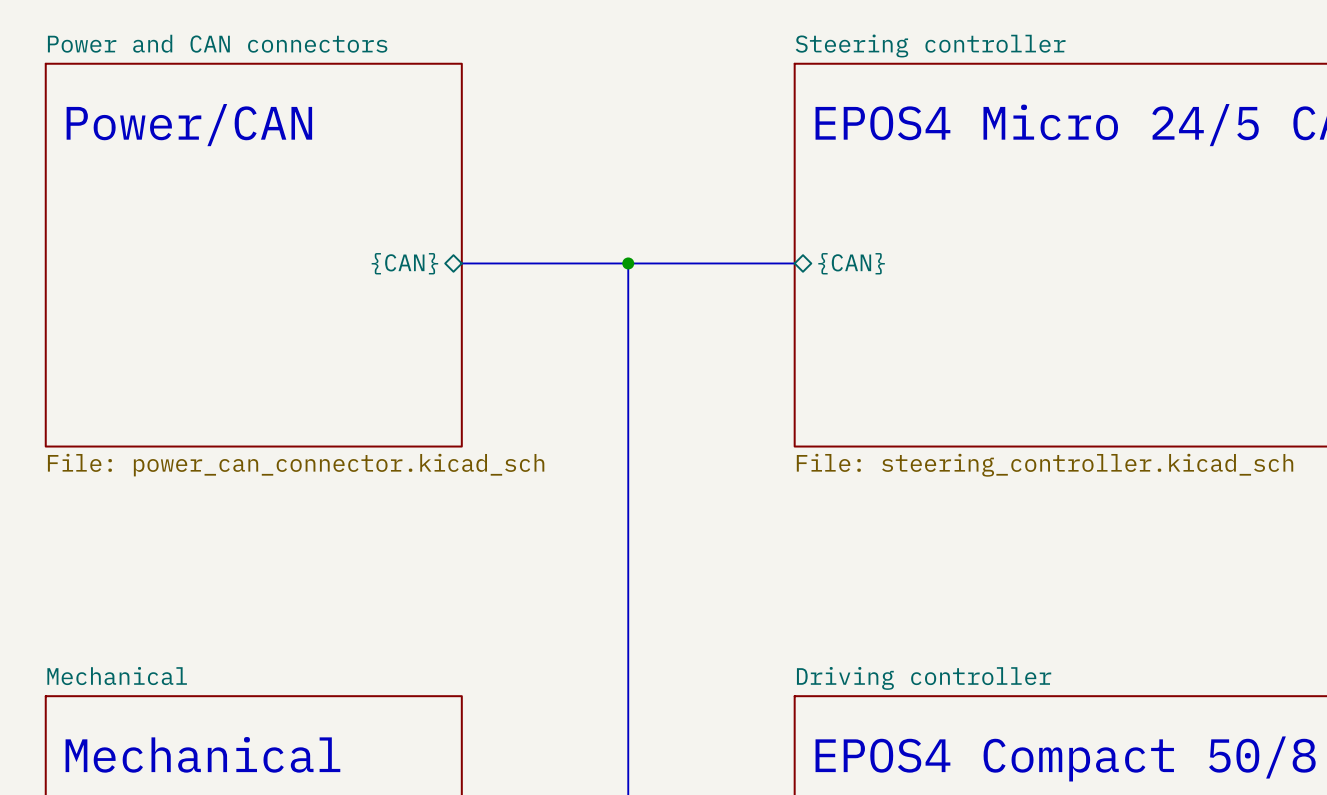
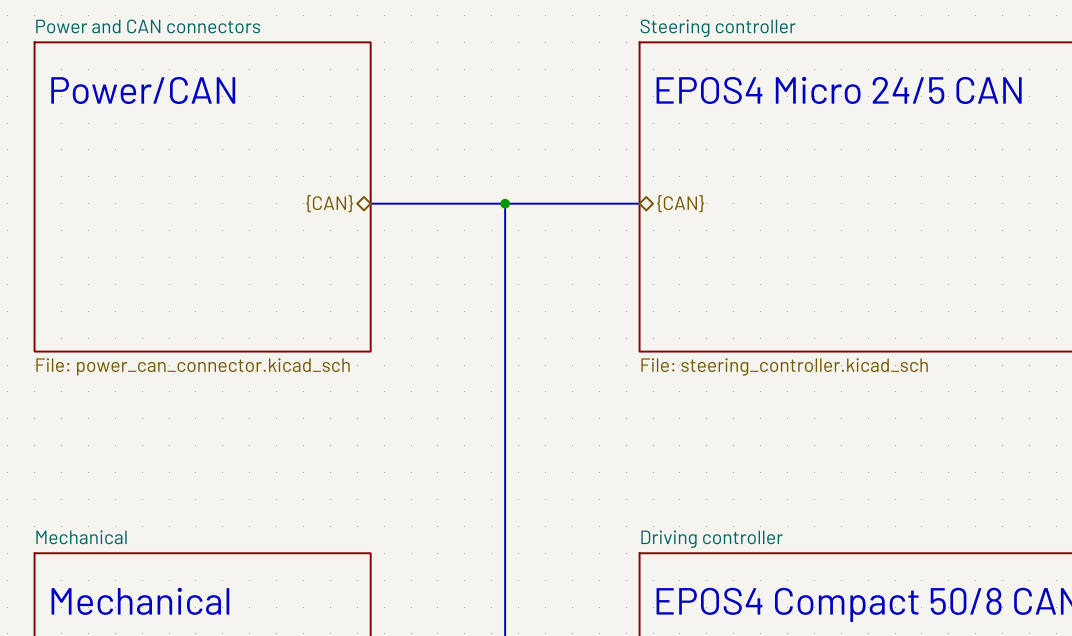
sheet pin: {CAN} (404, 263) -> none
hierarchical label: none -> {CAN} (329, 203)
sheet pin: {CAN} (851, 263) -> none
hierarchical label: none -> {CAN} (680, 203)

